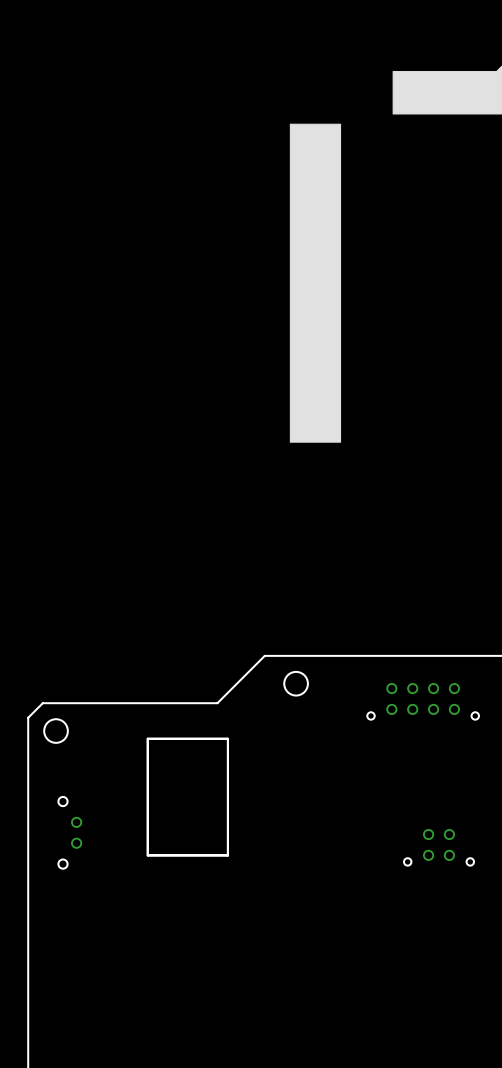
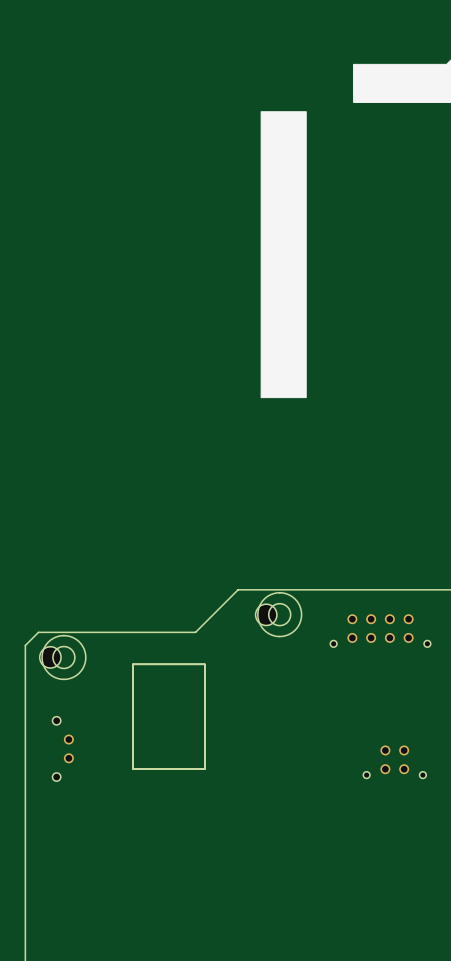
board edge: none -> (279, 592) (288, 594) (295, 599) (299, 606) (301, 614) (299, 623) (295, 630) (288, 634) (279, 636) (271, 634) (264, 630) (259, 623) (257, 614) (259, 606) (264, 599) (271, 594) (279, 592)
round board edge: none -> [268, 603, 291, 626]
board edge: none -> (63, 635) (72, 637) (79, 642) (84, 649) (85, 657) (84, 665) (79, 672) (72, 677) (63, 679) (55, 677) (48, 672) (43, 665) (42, 657) (43, 649) (48, 642) (55, 637) (63, 635)
round board edge: none -> [52, 646, 76, 669]

